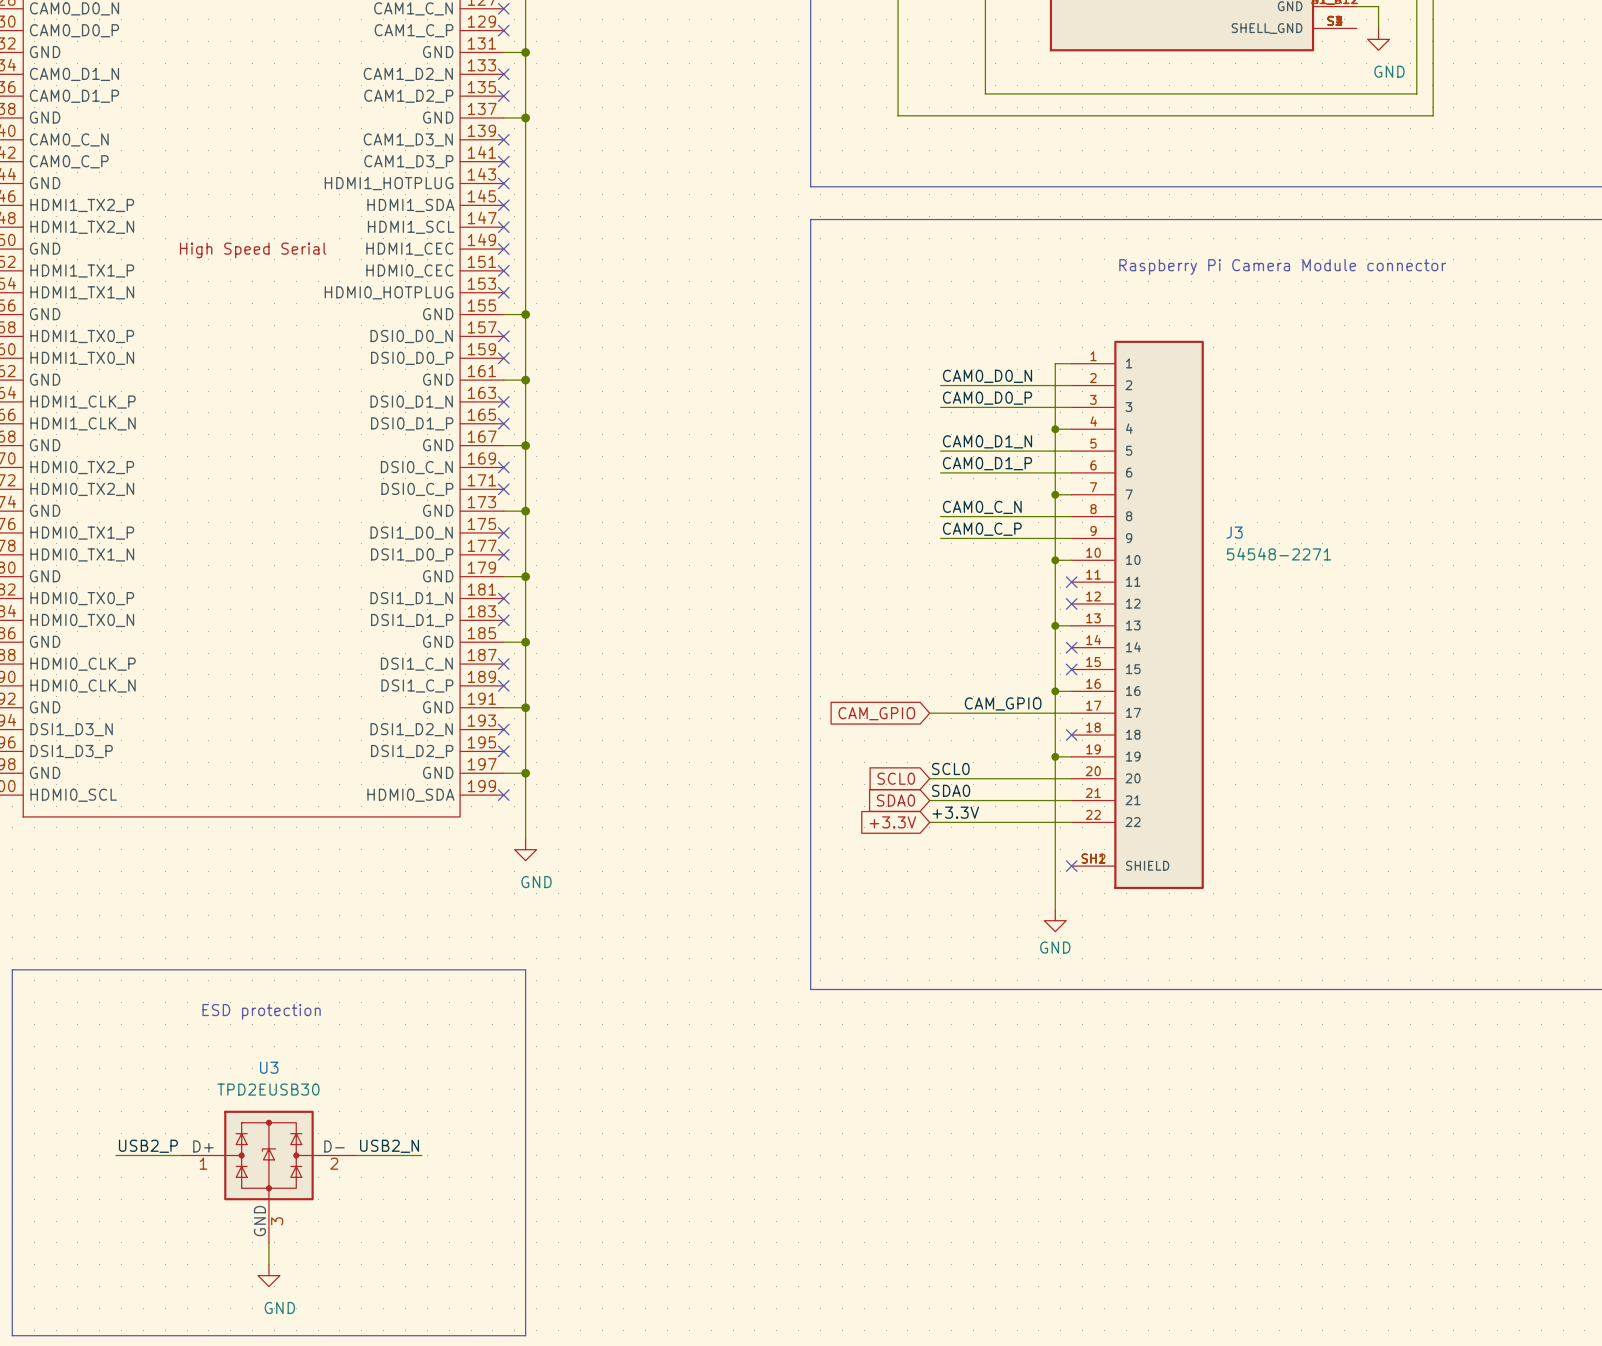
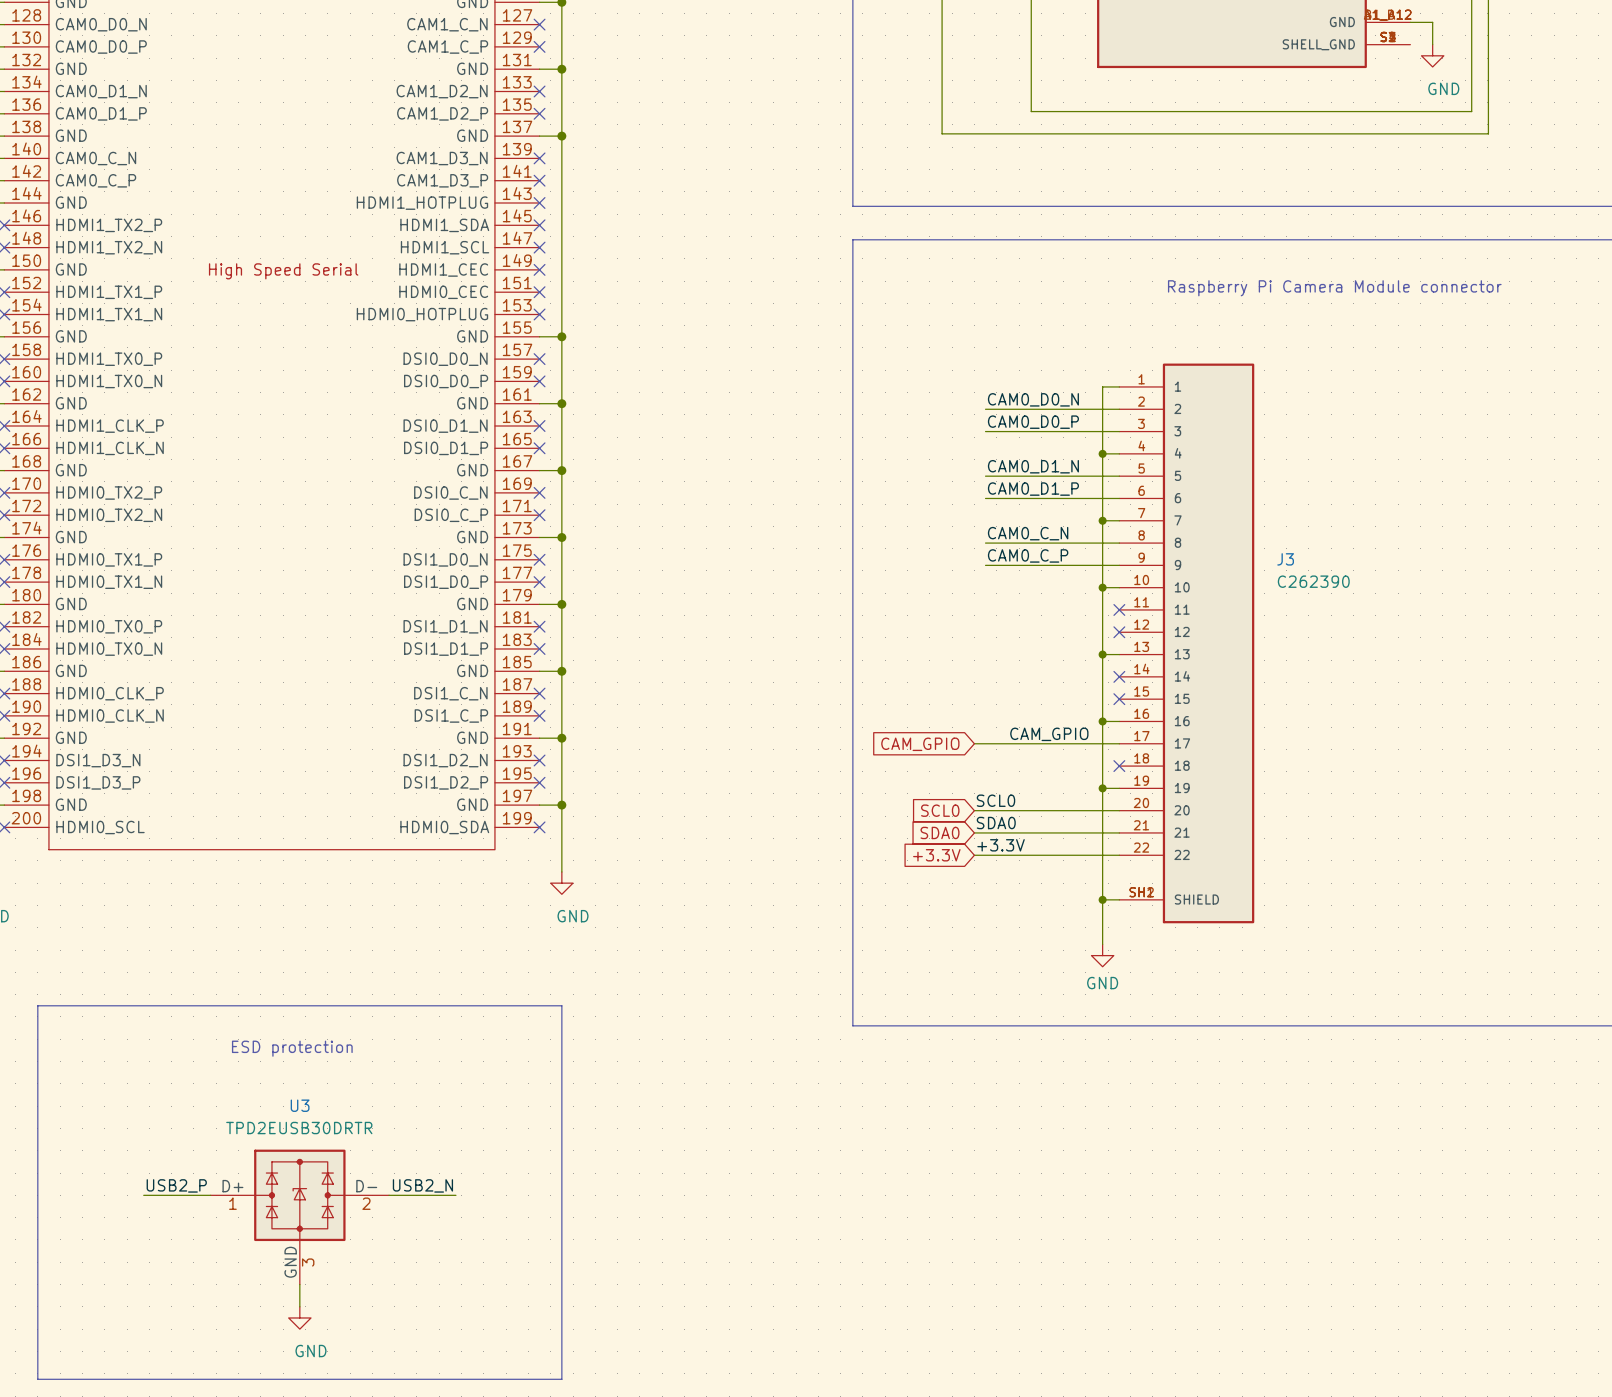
J3 value: 54548-2271 (1279, 554) -> C262390 (1313, 581)
wire: none -> (1102, 899) (1119, 899)
junction: none -> (1102, 899)
no-connect mark: (1071, 866) -> none
U3 value: TPD2EUSB30 (268, 1089) -> TPD2EUSB30DRTR (299, 1128)

